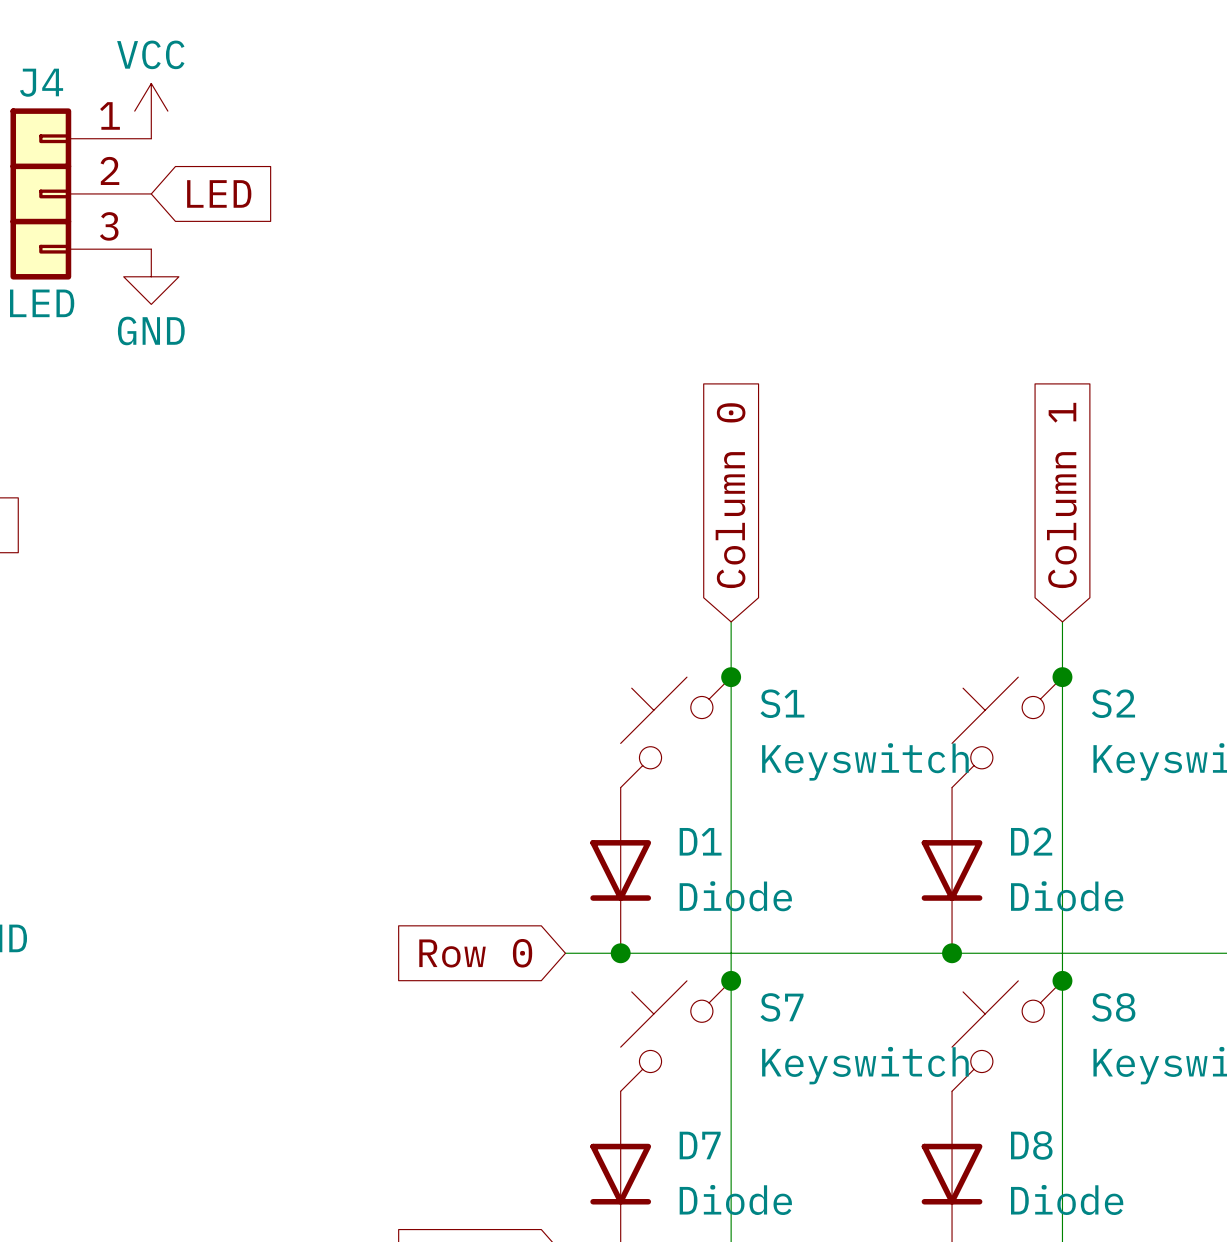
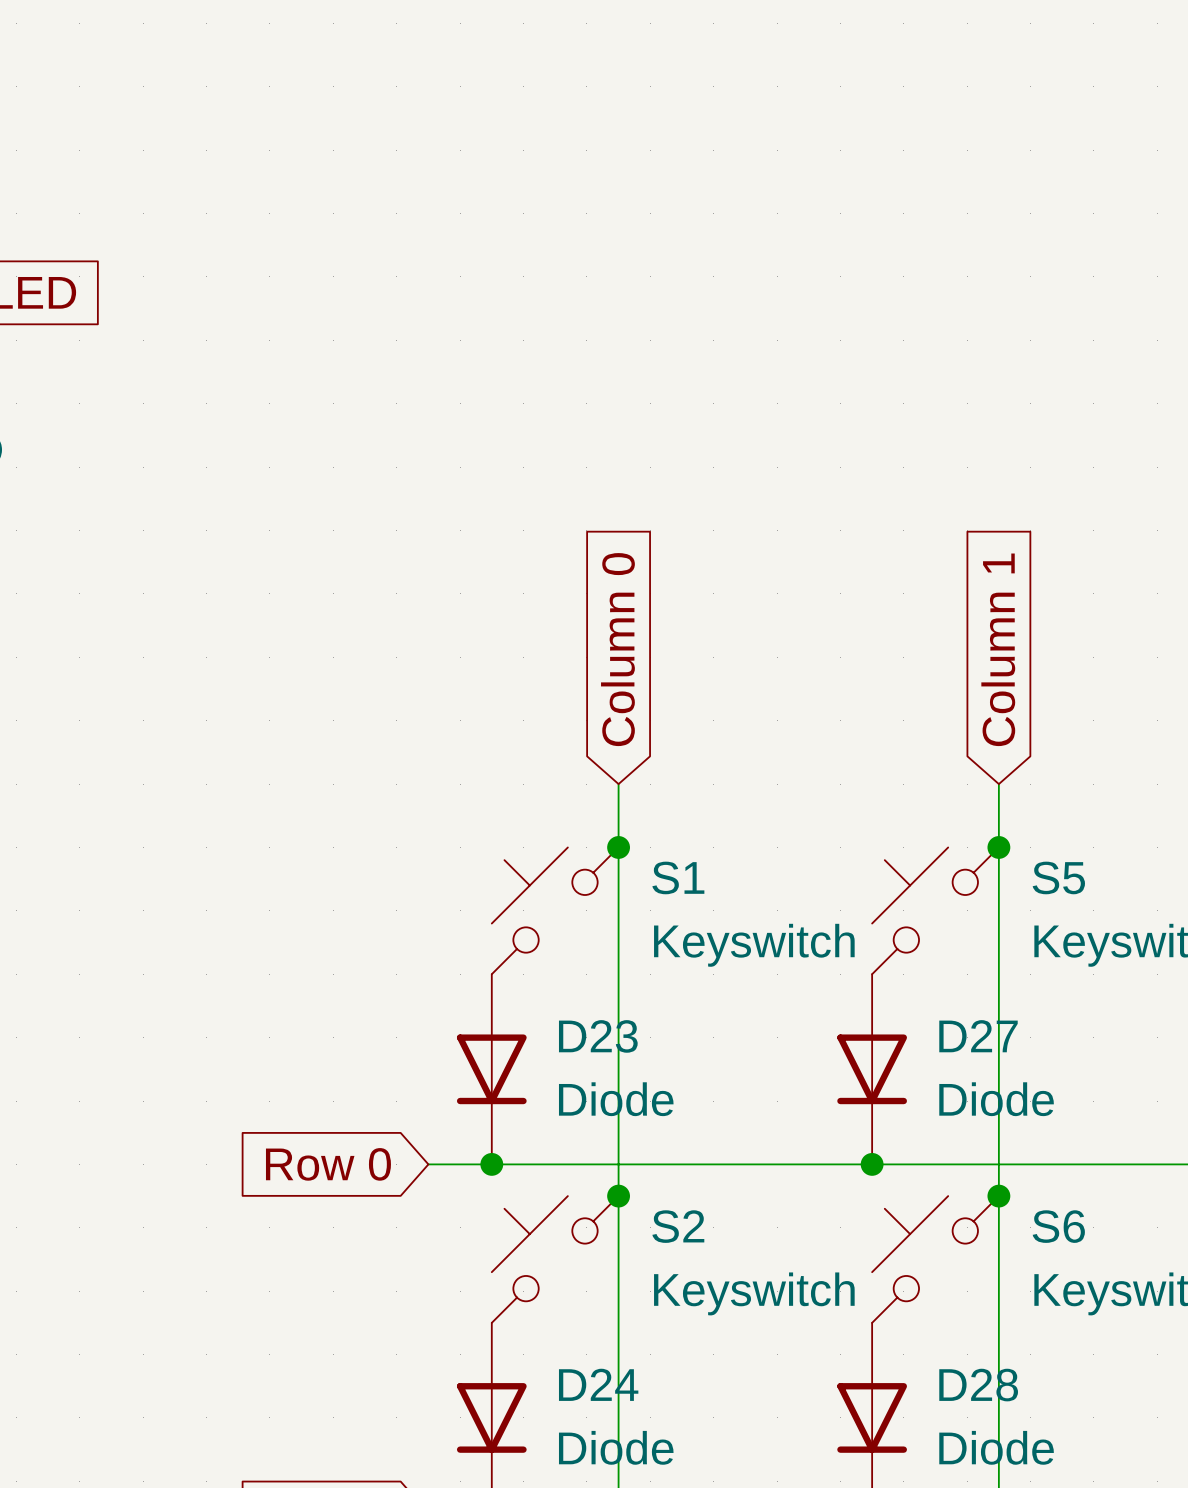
S2 name: S2 (1113, 703) -> S5 (1058, 877)
D1 name: D1 (700, 841) -> D23 (598, 1036)
D2 name: D2 (1031, 841) -> D27 (978, 1036)
S7 name: S7 (782, 1007) -> S2 (678, 1226)
S8 name: S8 (1113, 1007) -> S6 (1058, 1226)
D7 name: D7 (700, 1145) -> D24 (598, 1384)
D8 name: D8 (1031, 1145) -> D28 (978, 1385)

